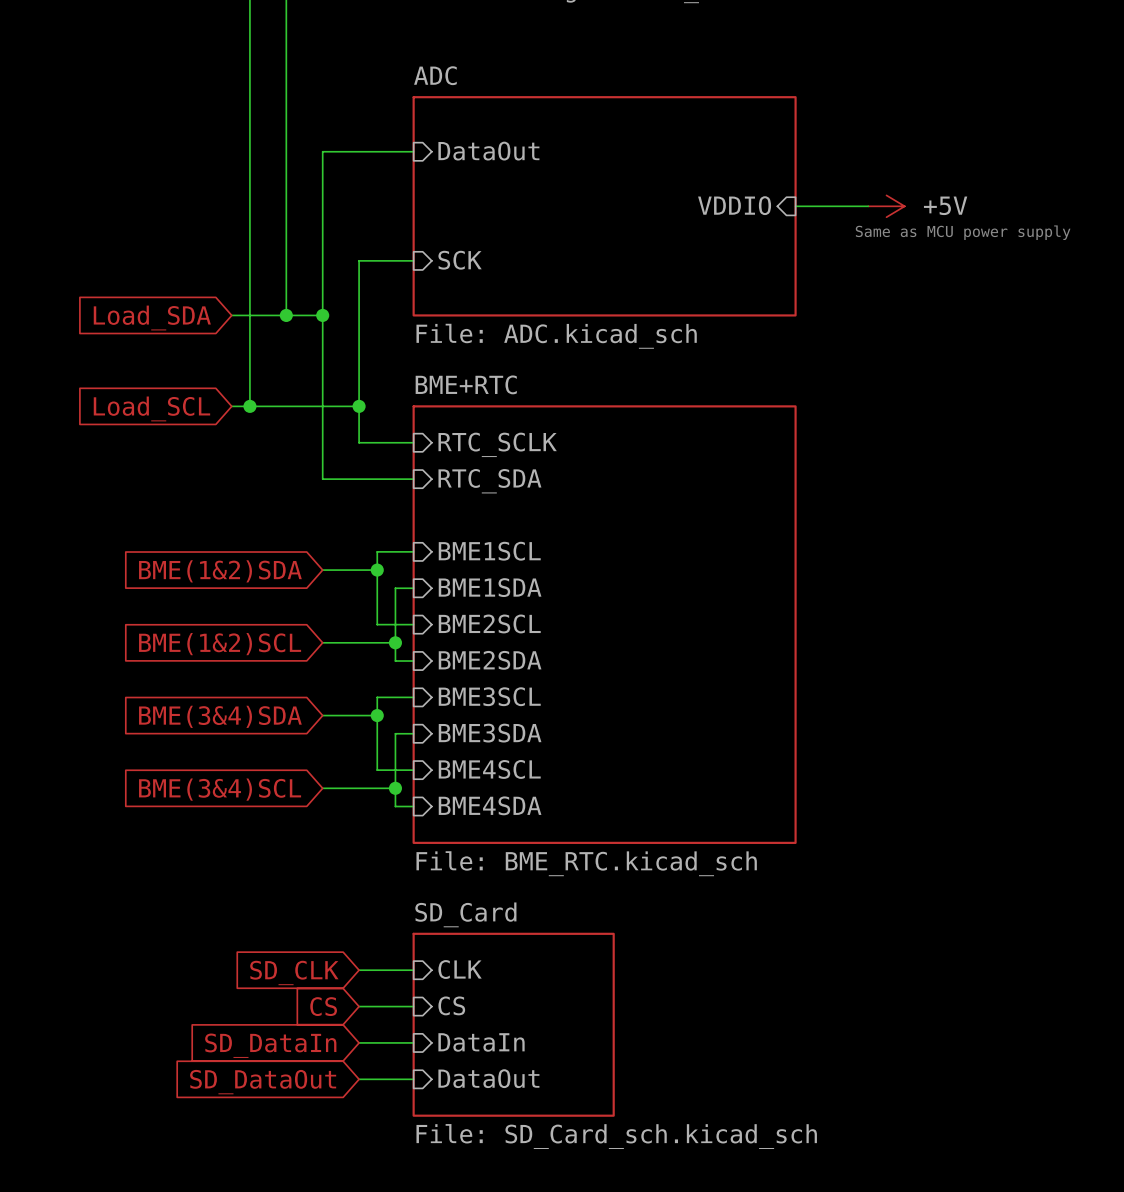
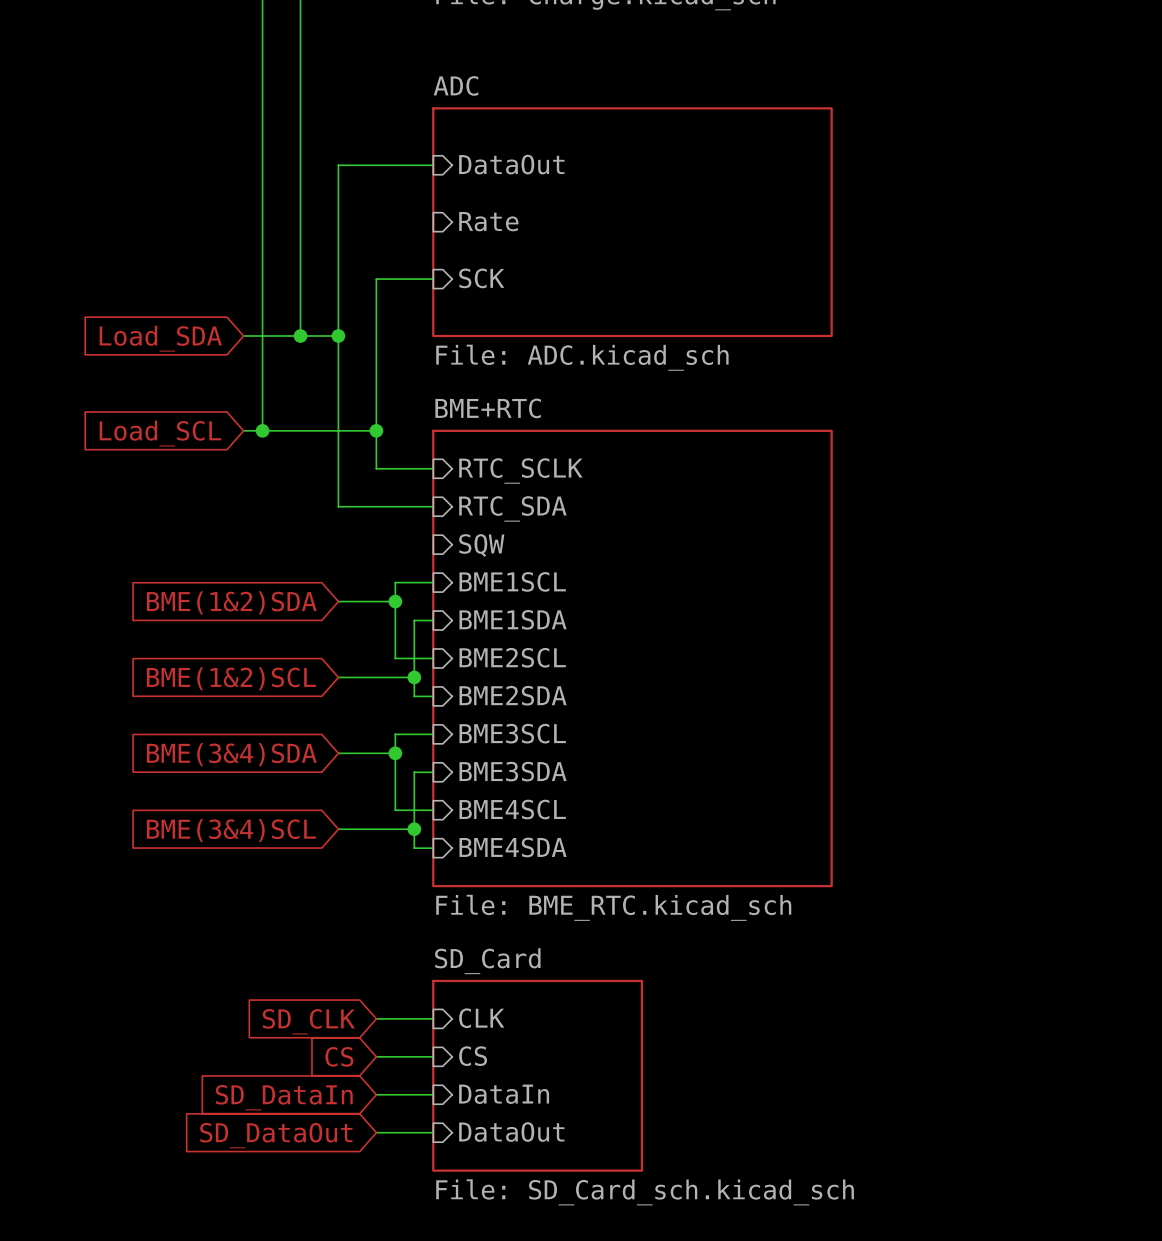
sheet pin: none -> Rate (488, 221)
sheet pin: VDDIO (734, 205) -> none
wire: (795, 206) (868, 206) -> none
power symbol: +5V (886, 206) -> none
text: Same as MCU power supply (963, 232) -> none
sheet pin: none -> SQW (481, 545)

